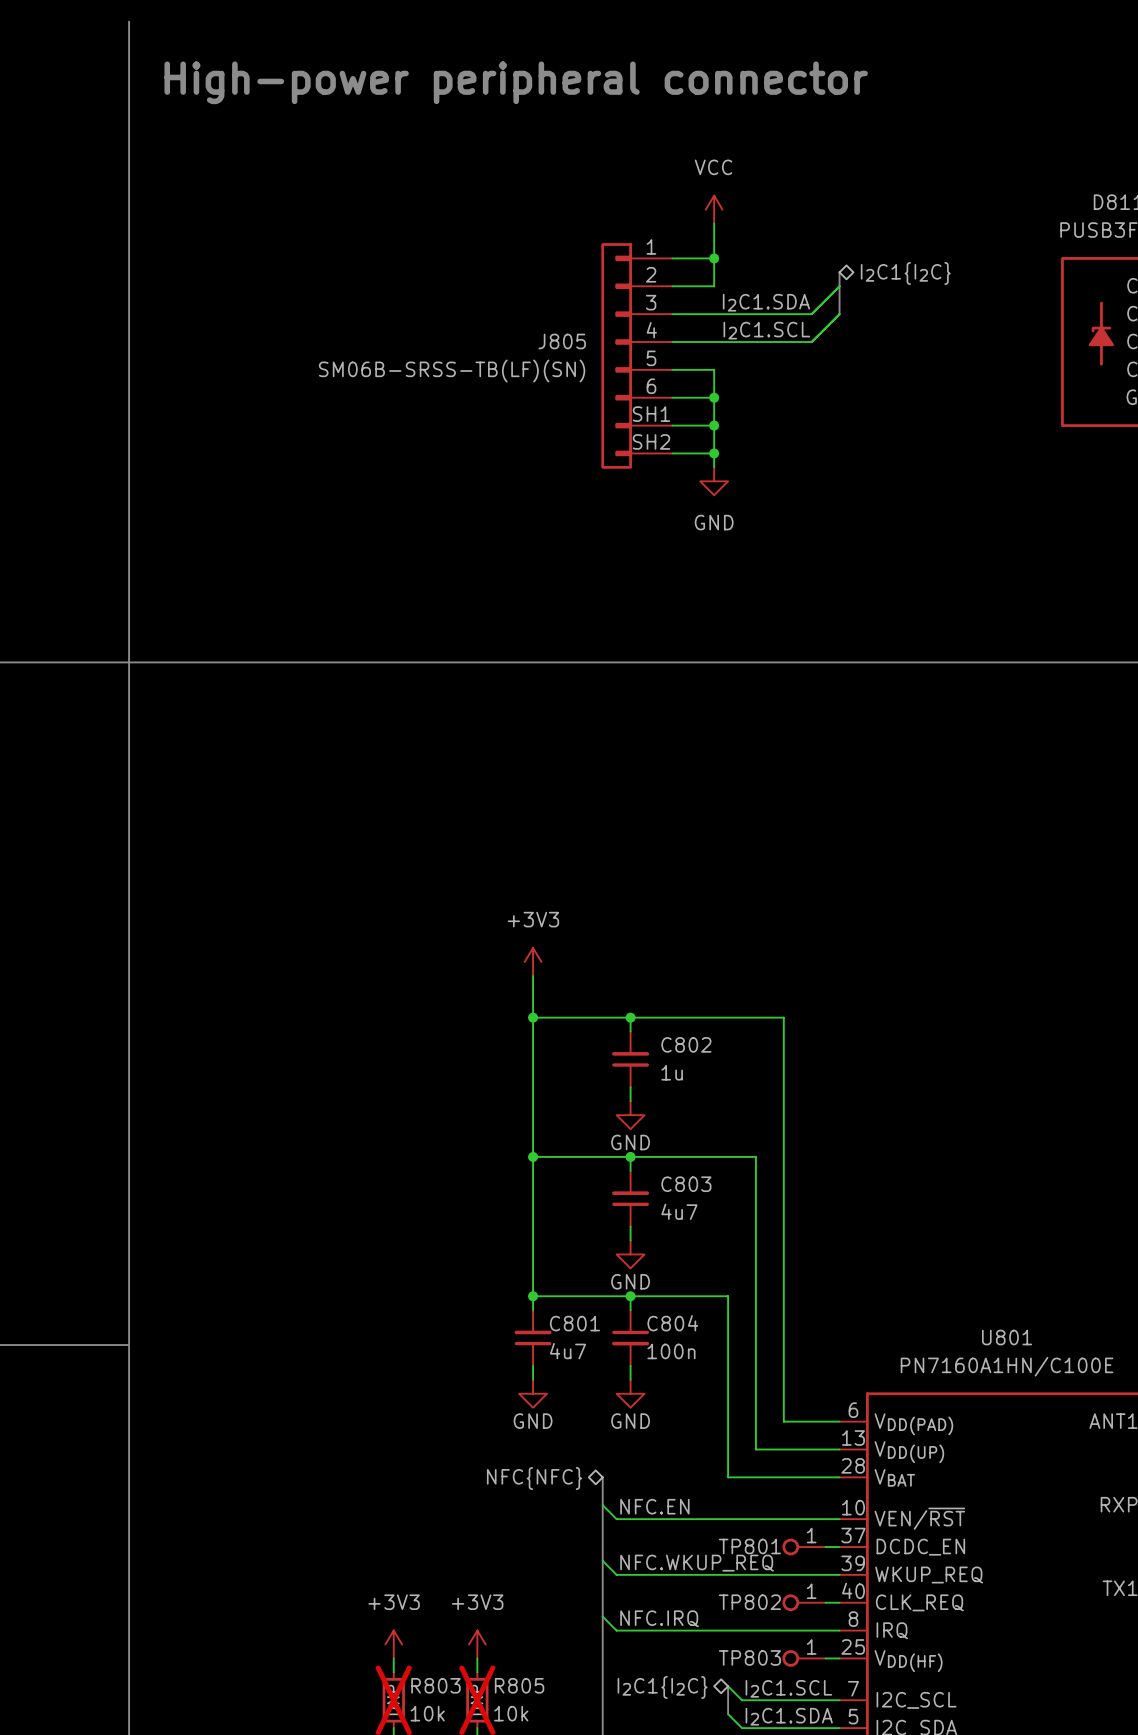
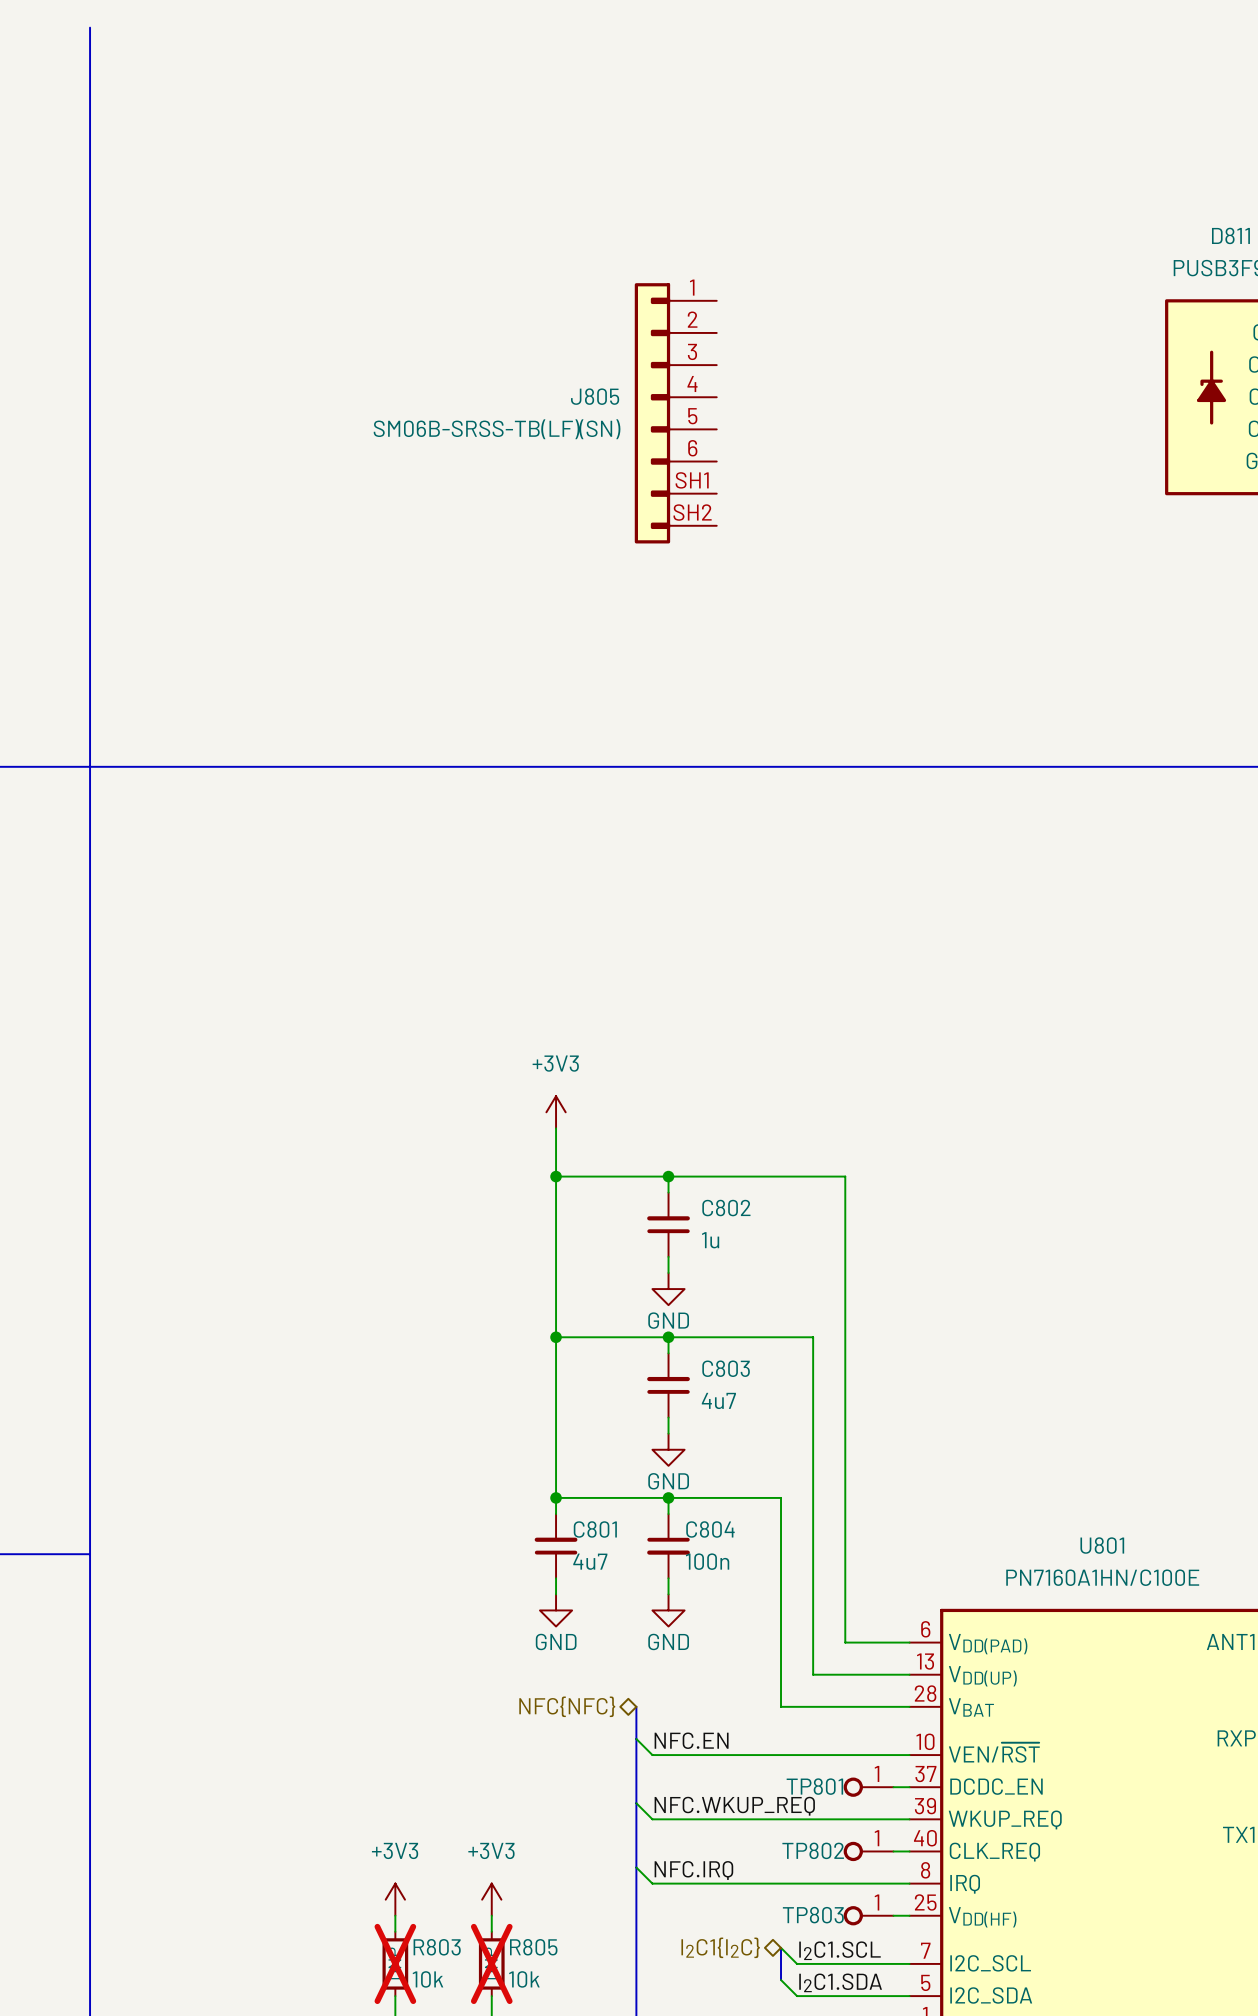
text: High-power peripheral connector (516, 82) -> none
power symbol: VCC (714, 209) -> none
wire: (714, 223) (714, 286) (672, 286) -> none
wire: (672, 258) (714, 258) -> none
junction: (714, 258) -> none
bus: (839, 272) (839, 314) -> none
hierarchical label: I2C1{I2C} (905, 273) -> none
wire: (839, 286) (811, 314) (672, 314) -> none
label: I2C1.SDA (766, 302) -> none
wire: (839, 314) (811, 342) (672, 342) -> none
label: I2C1.SCL (766, 330) -> none
wire: (672, 369) (714, 369) (714, 467) -> none
wire: (672, 397) (714, 397) -> none
junction: (714, 397) -> none
wire: (672, 425) (714, 425) -> none
junction: (714, 425) -> none
wire: (672, 453) (714, 453) -> none
junction: (714, 453) -> none
power symbol: GND (714, 481) -> none

